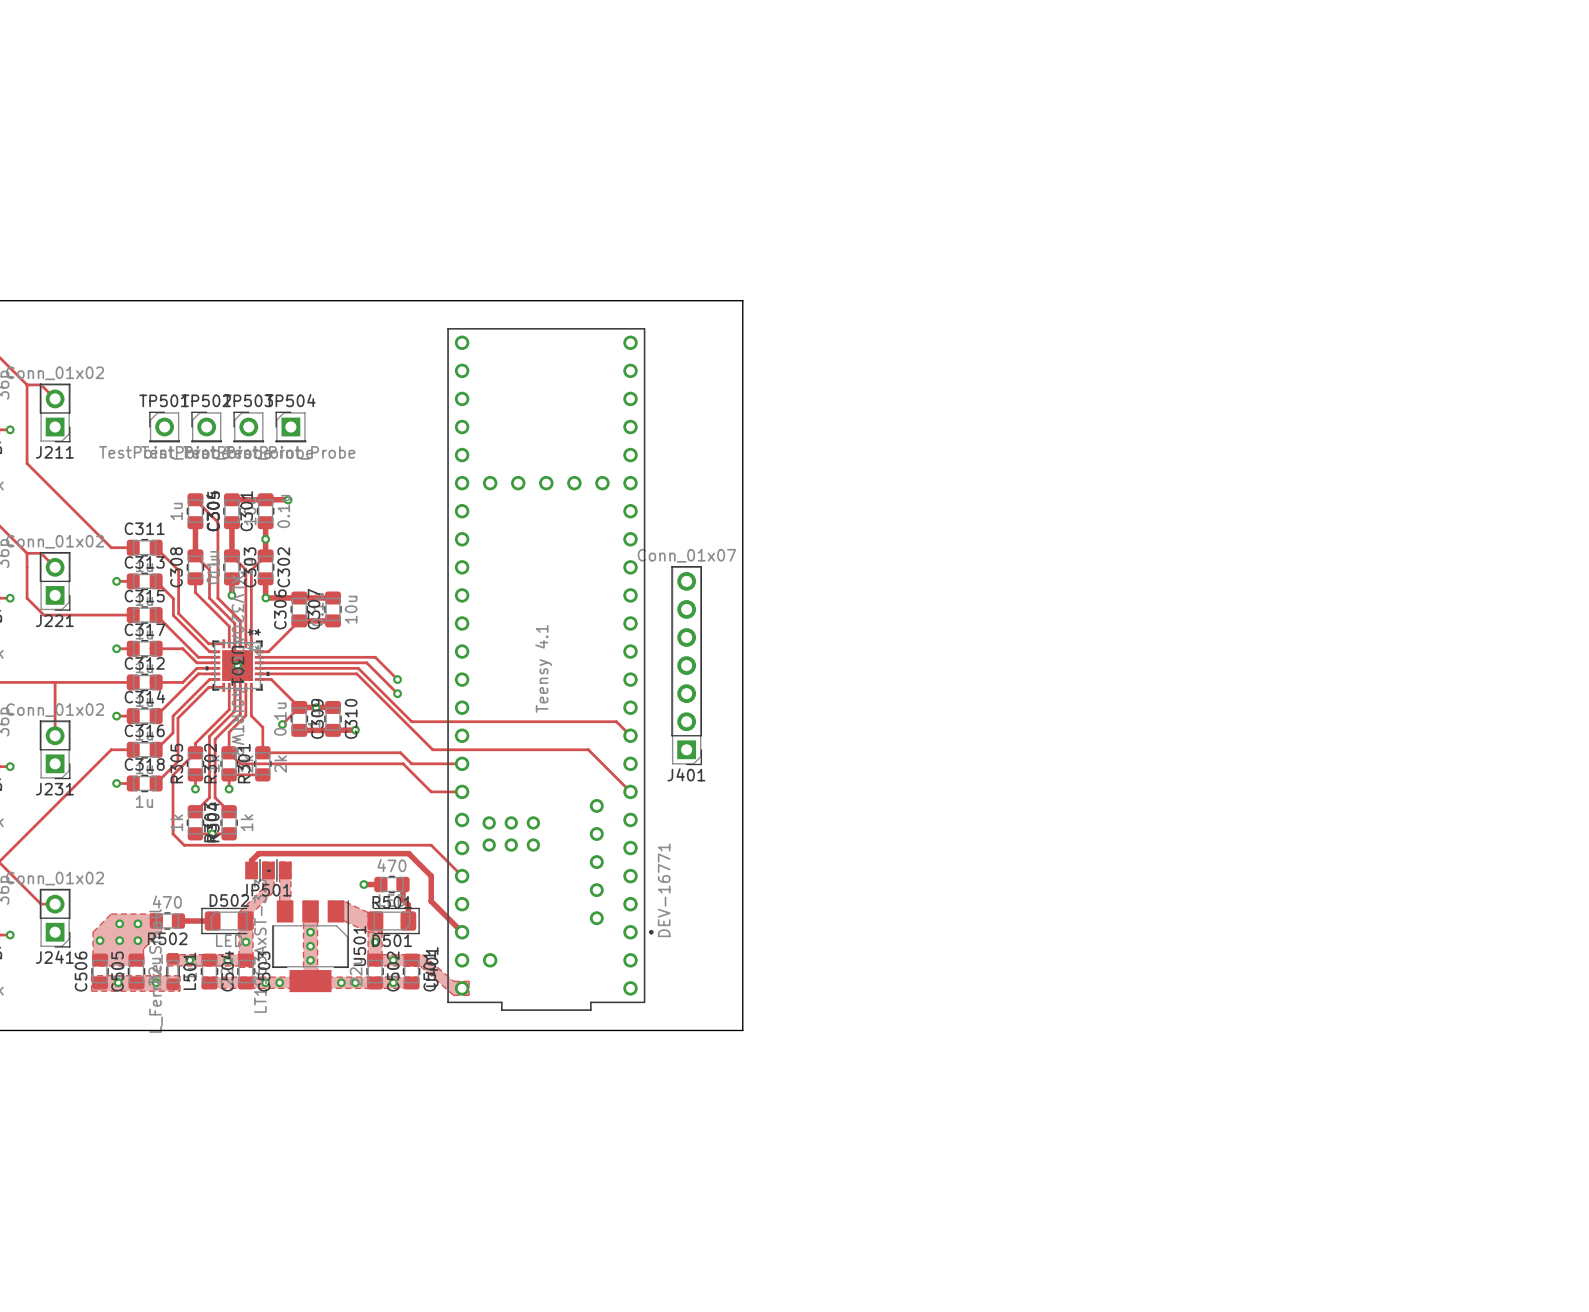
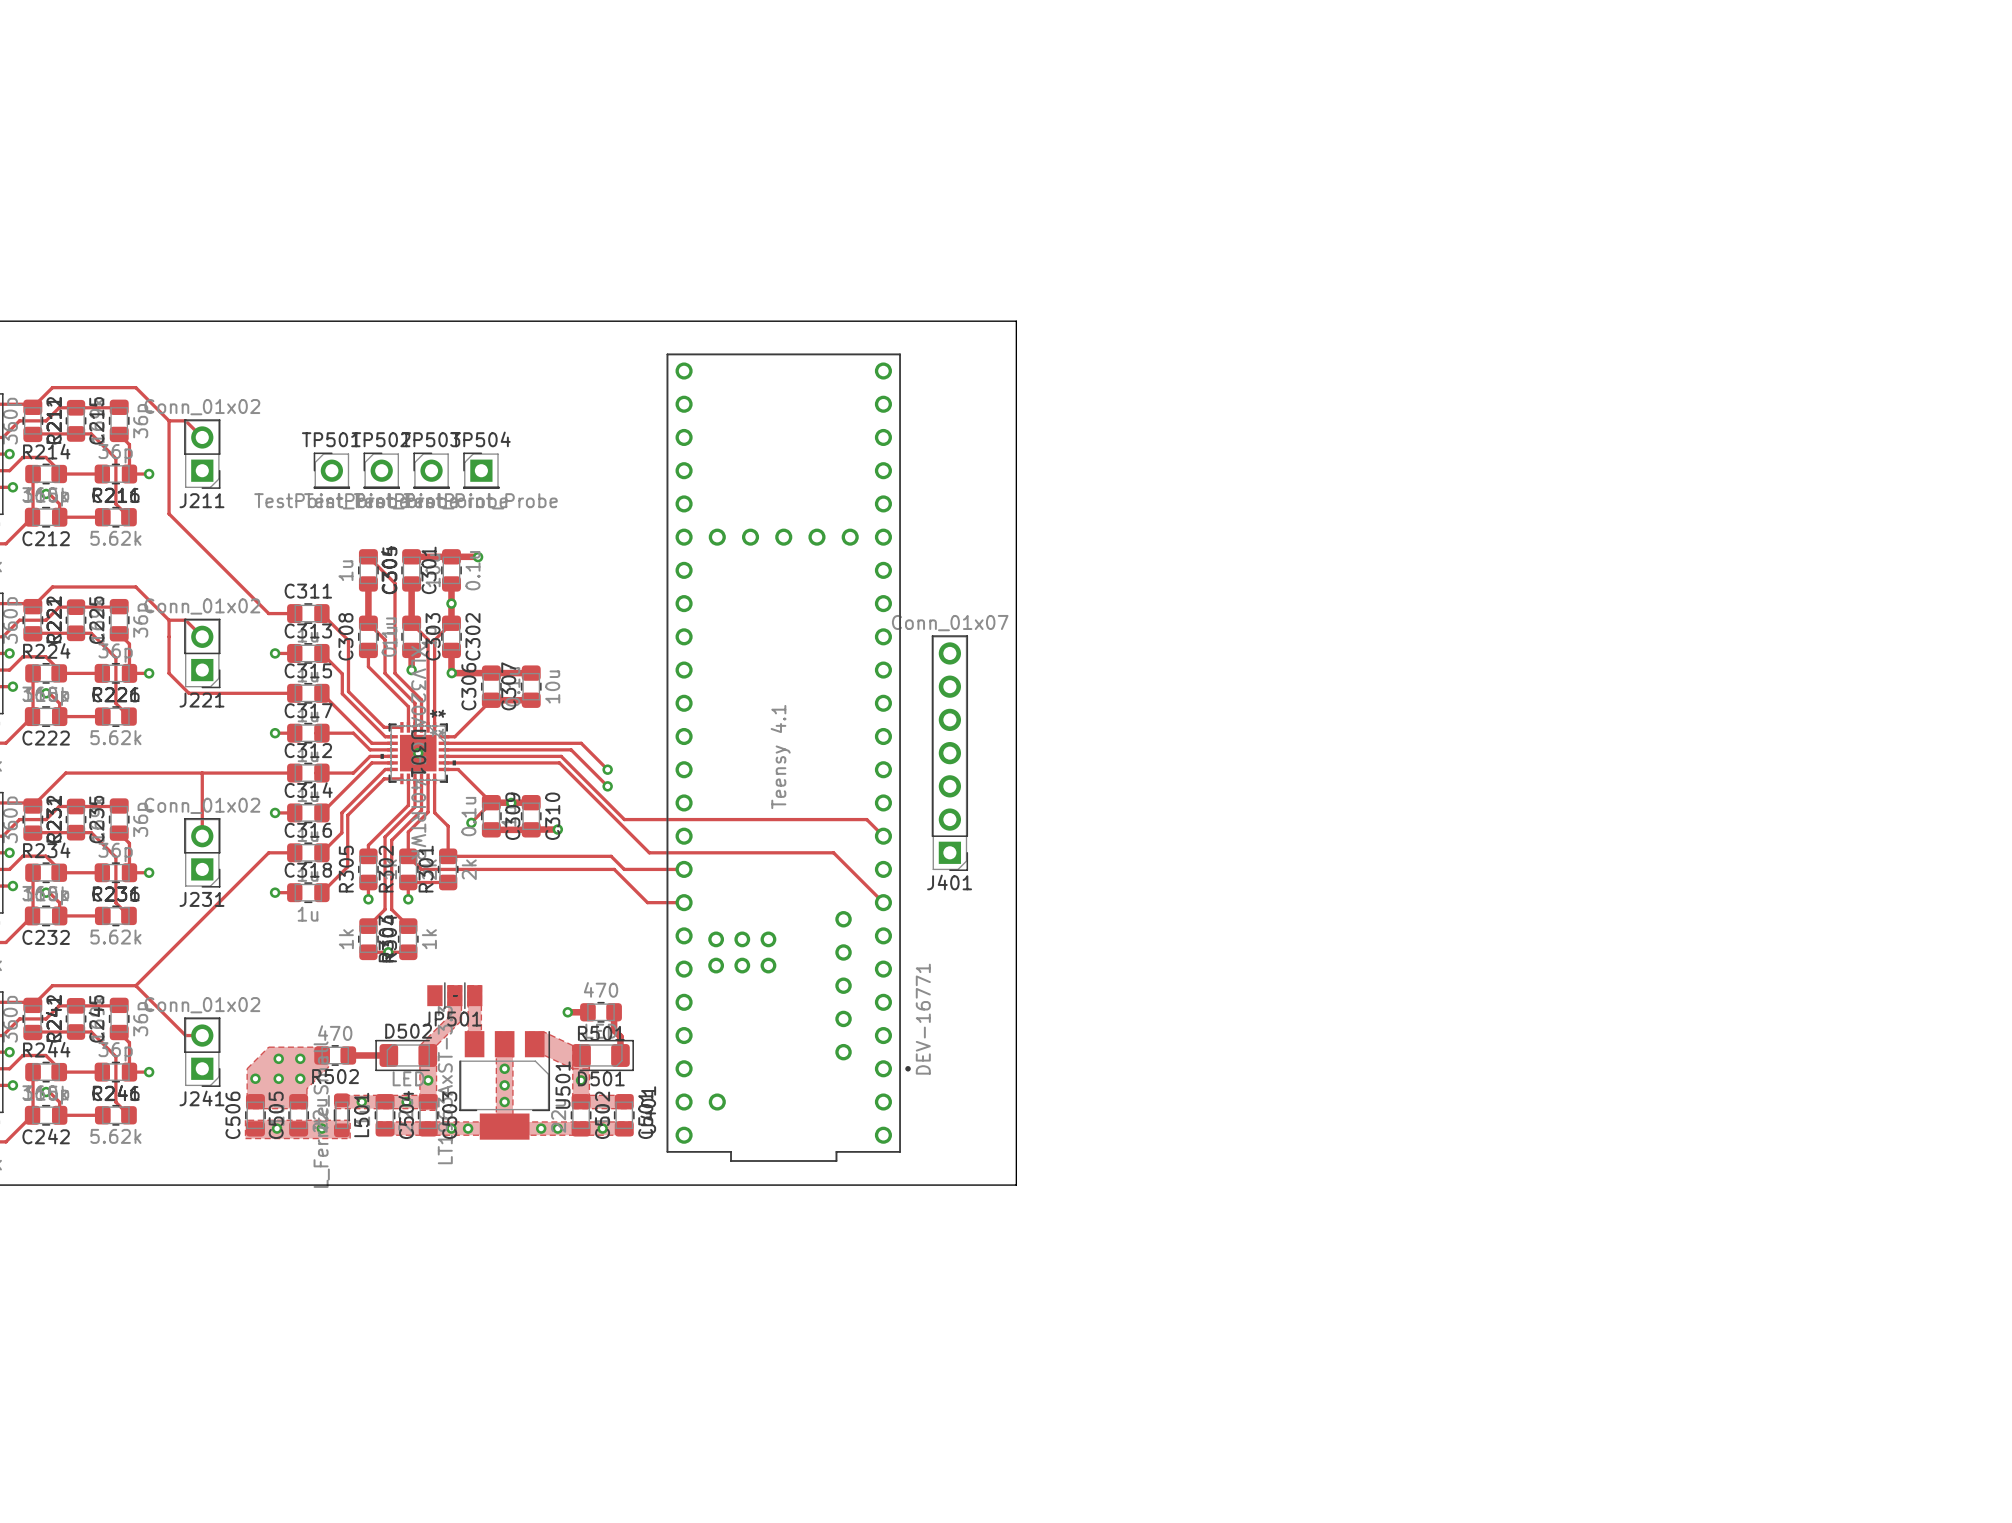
track: (195, 752) (173, 775) (173, 833) (184, 845) (431, 845) (462, 876) -> none
track: (251, 870) (251, 860) (258, 853) (408, 853) (431, 876) (431, 901) (462, 932) -> none
zone outline: (418, 954) (422, 954) (453, 981) (469, 981) (469, 995) (453, 995) (418, 965) -> none
via: (393, 960) -> none

